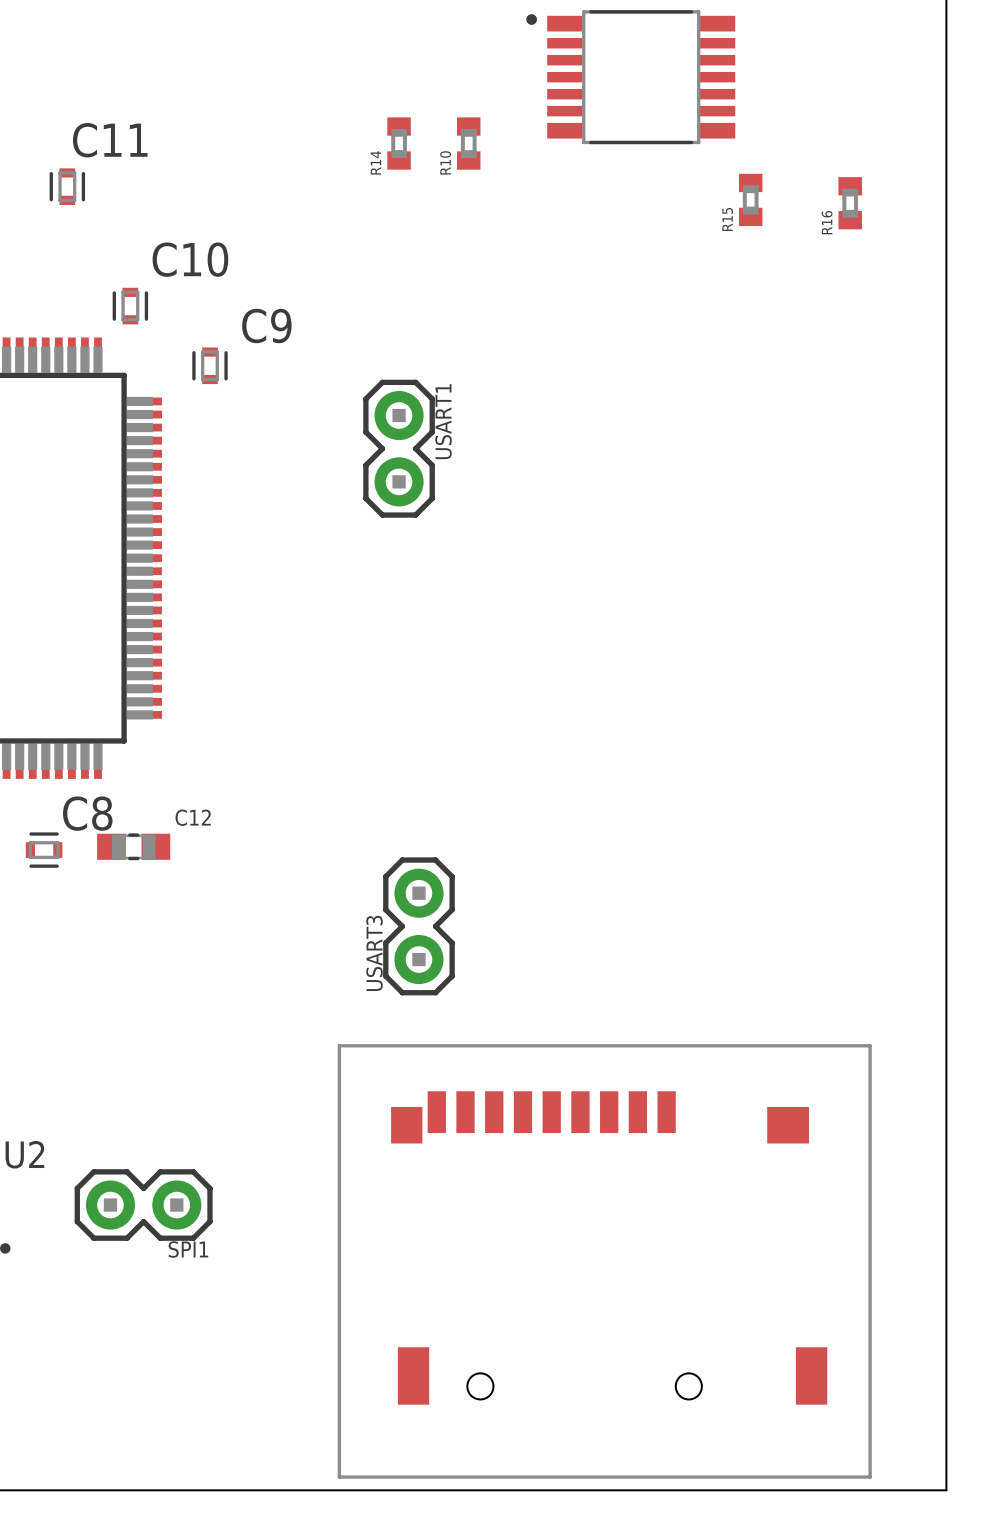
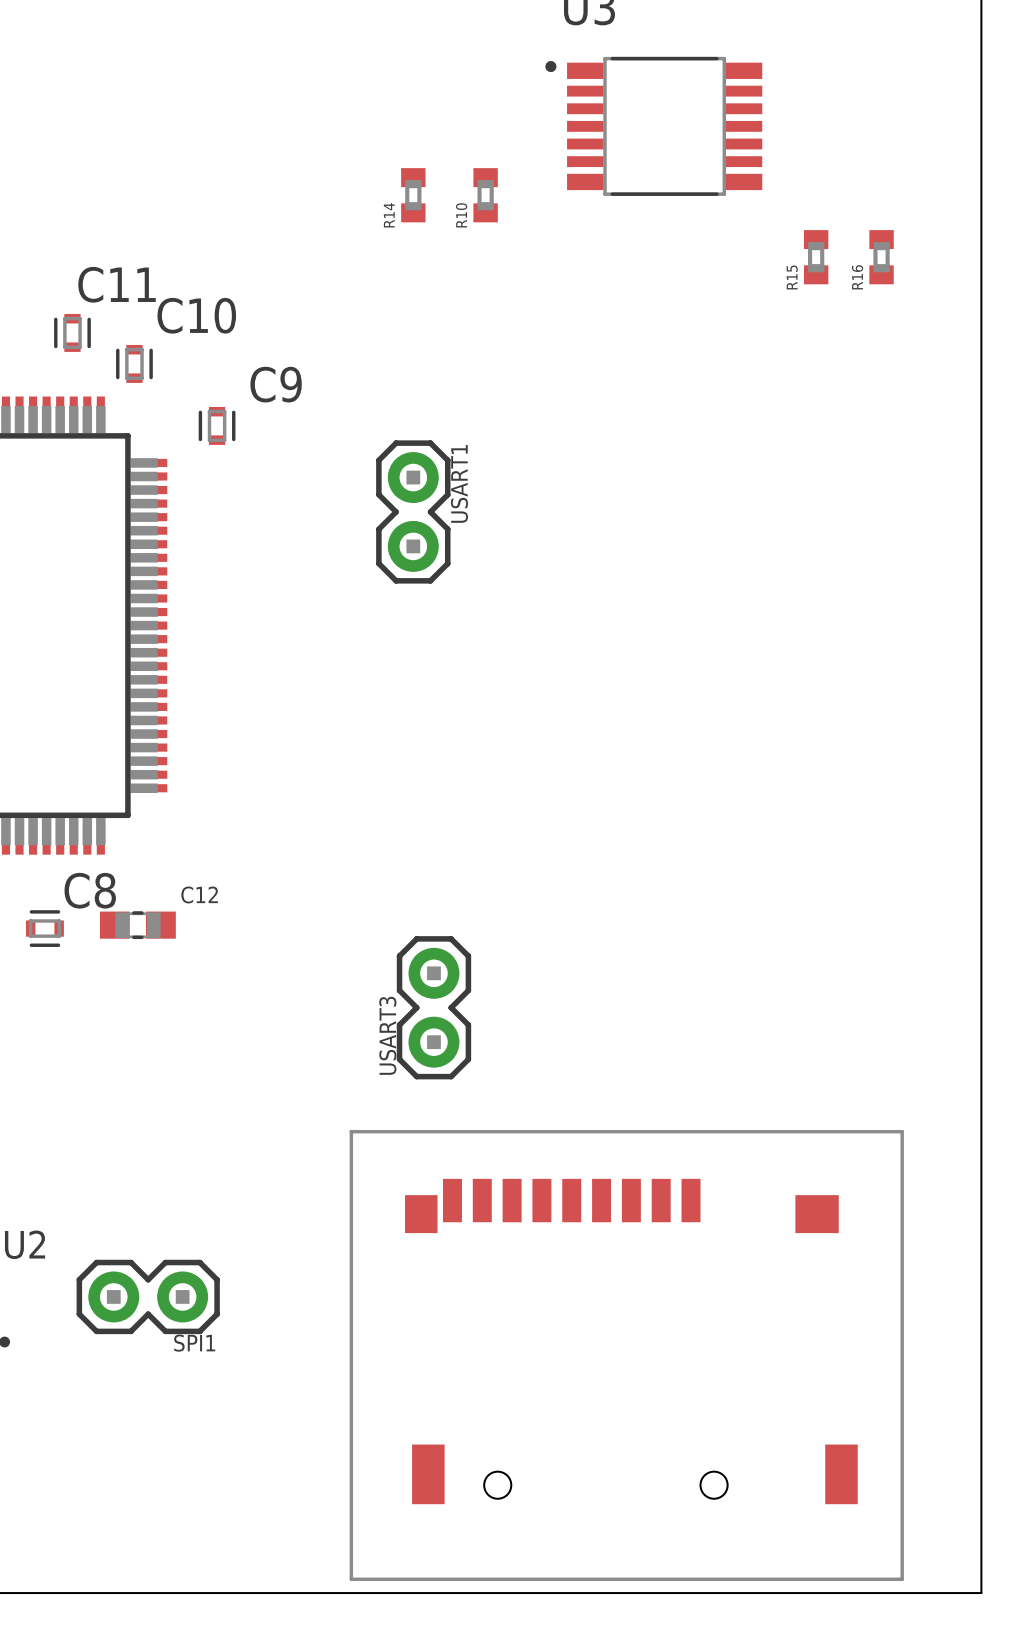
C11 position: (67, 186) -> (72, 332)
R15 position: (750, 199) -> (816, 257)

